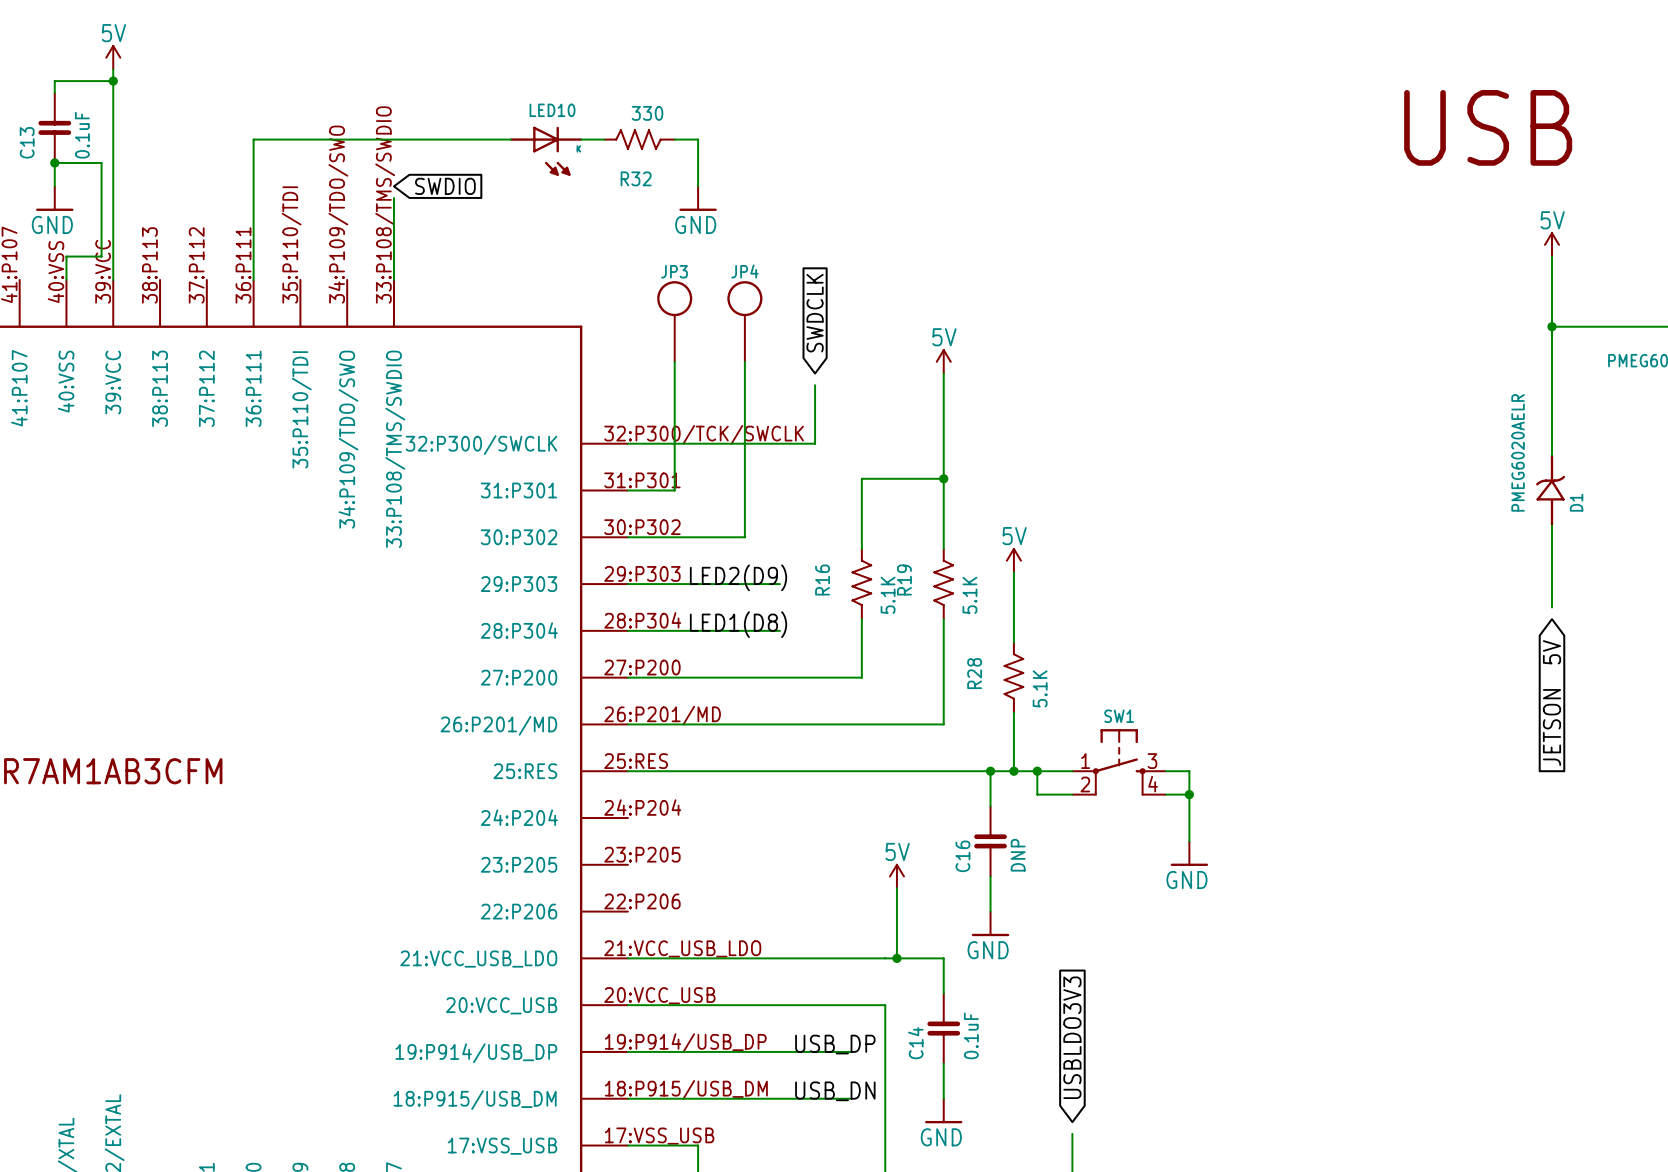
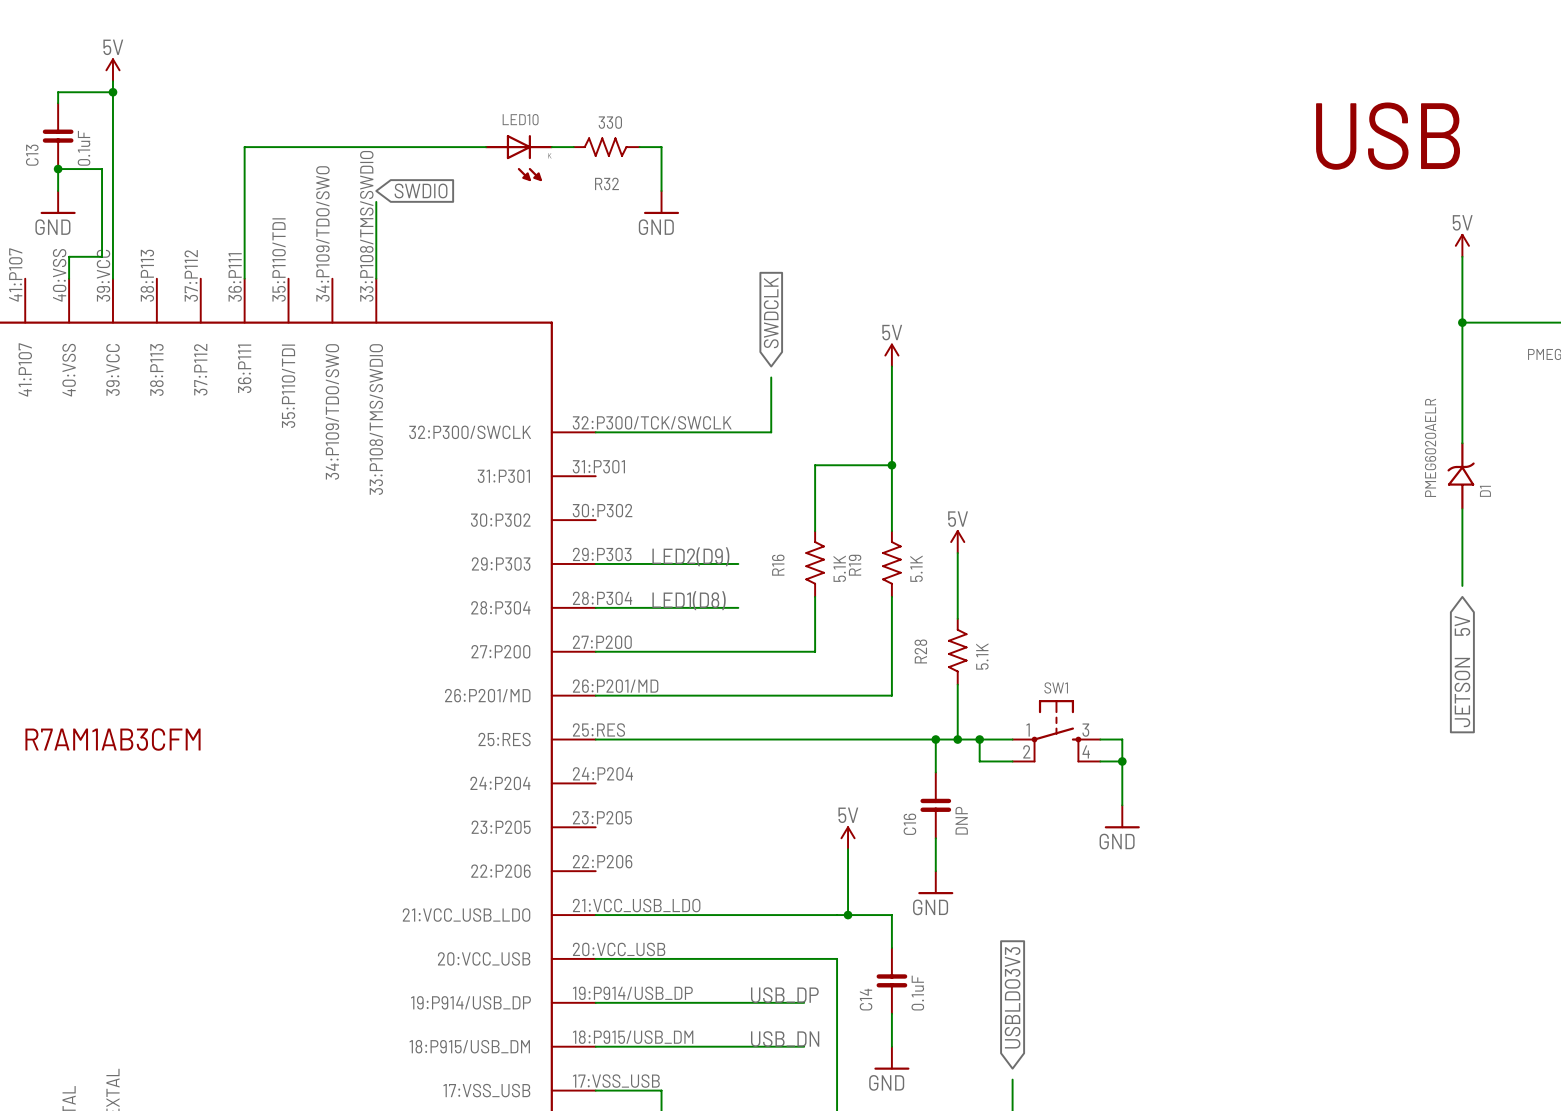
JP3: (674, 321) -> none
JP4: (744, 321) -> none
wire: (674, 361) (674, 490) (627, 490) -> none
wire: (744, 361) (744, 537) (627, 537) -> none

